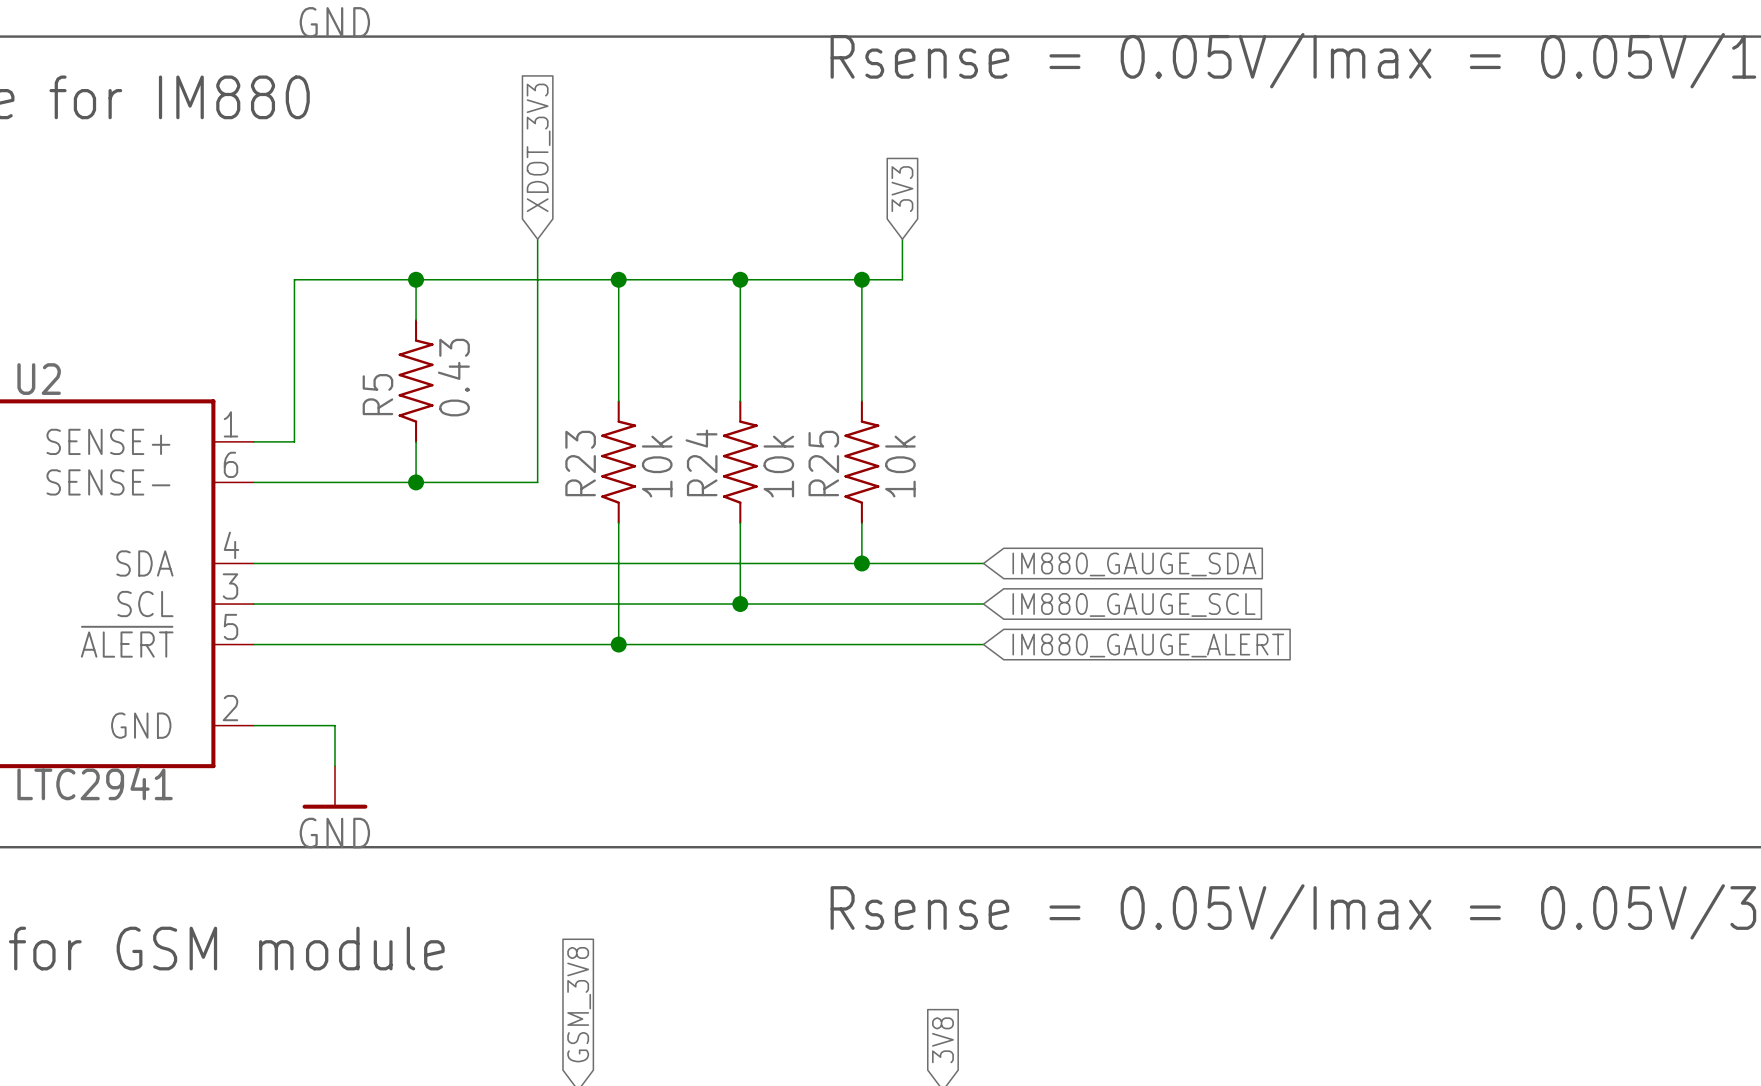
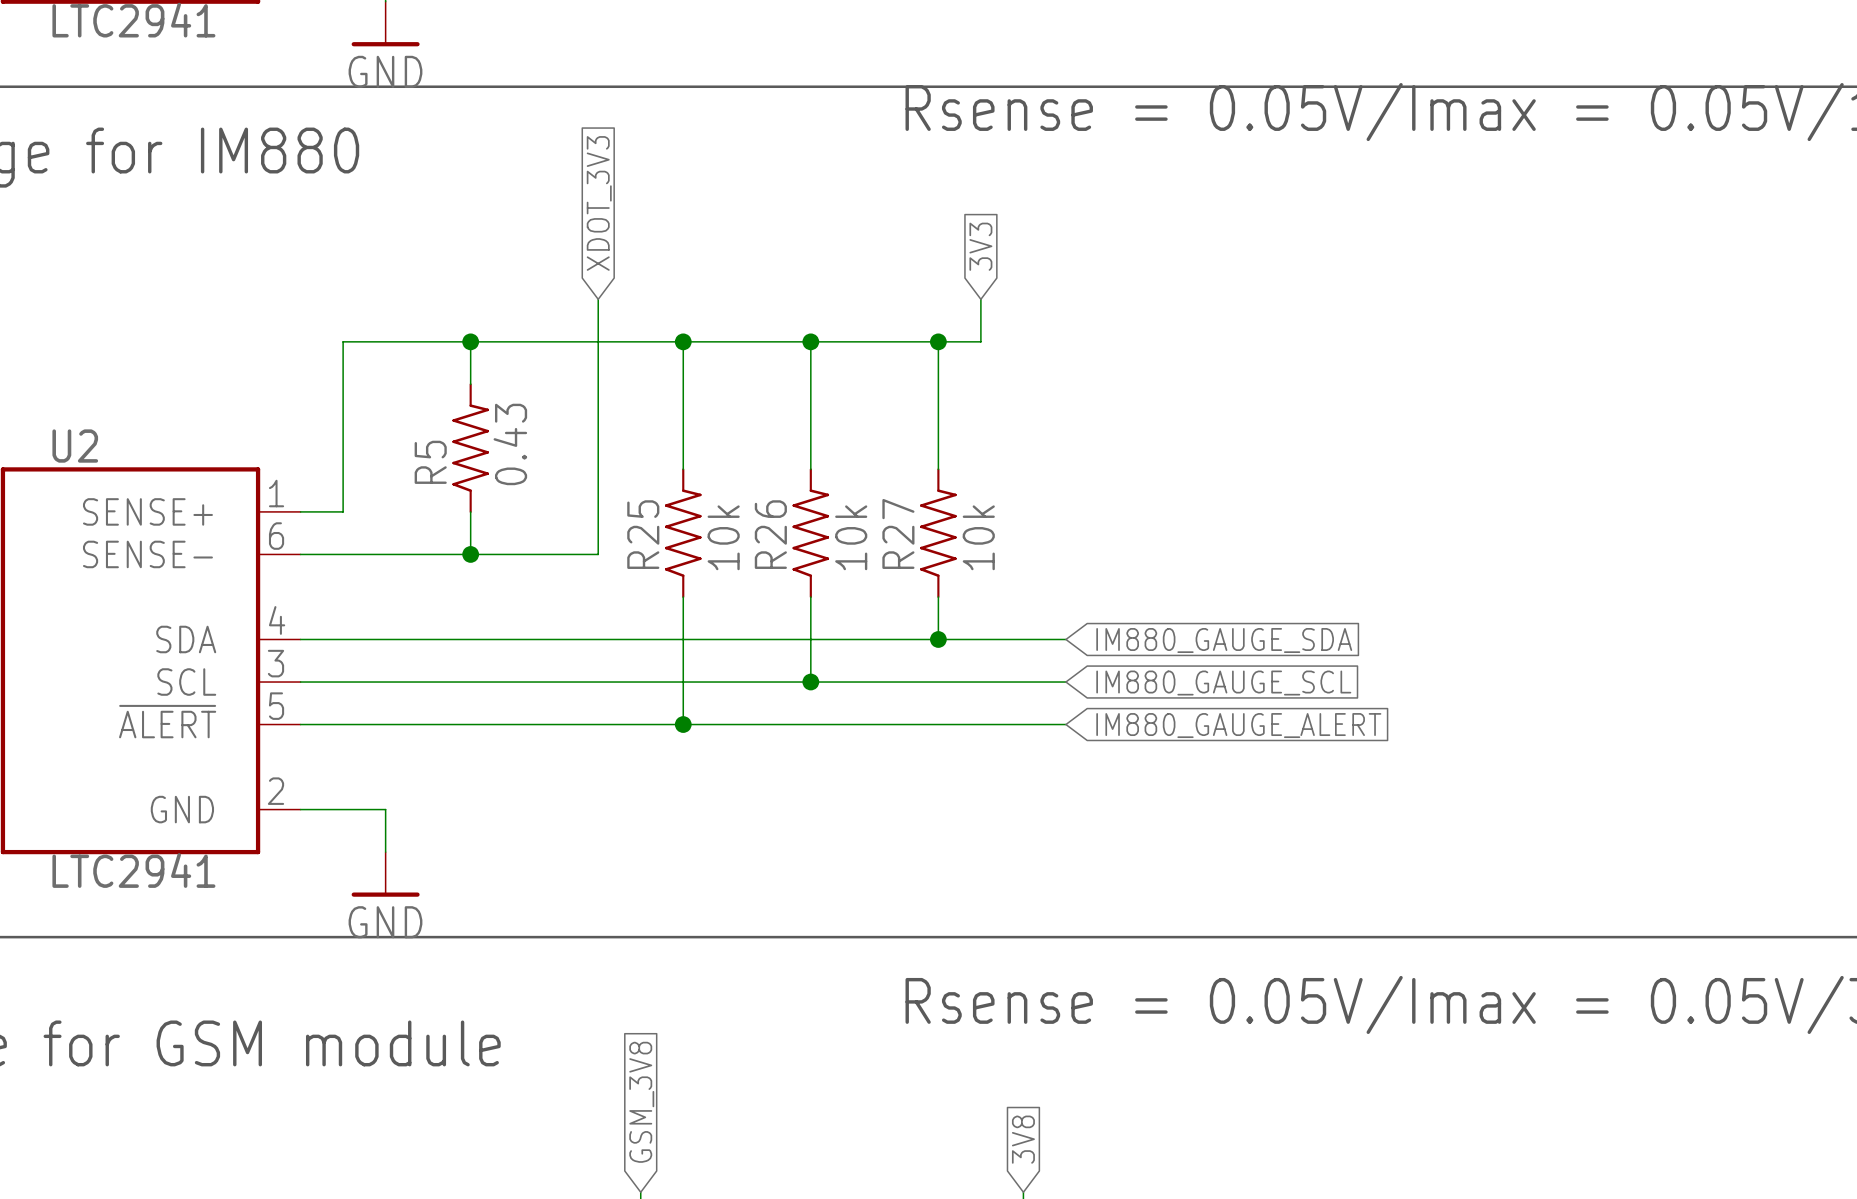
R24 name: R24 (701, 462) -> R26 (770, 534)
R23 name: R23 (580, 463) -> R25 (643, 534)
R25 name: R25 (823, 463) -> R27 (898, 533)

